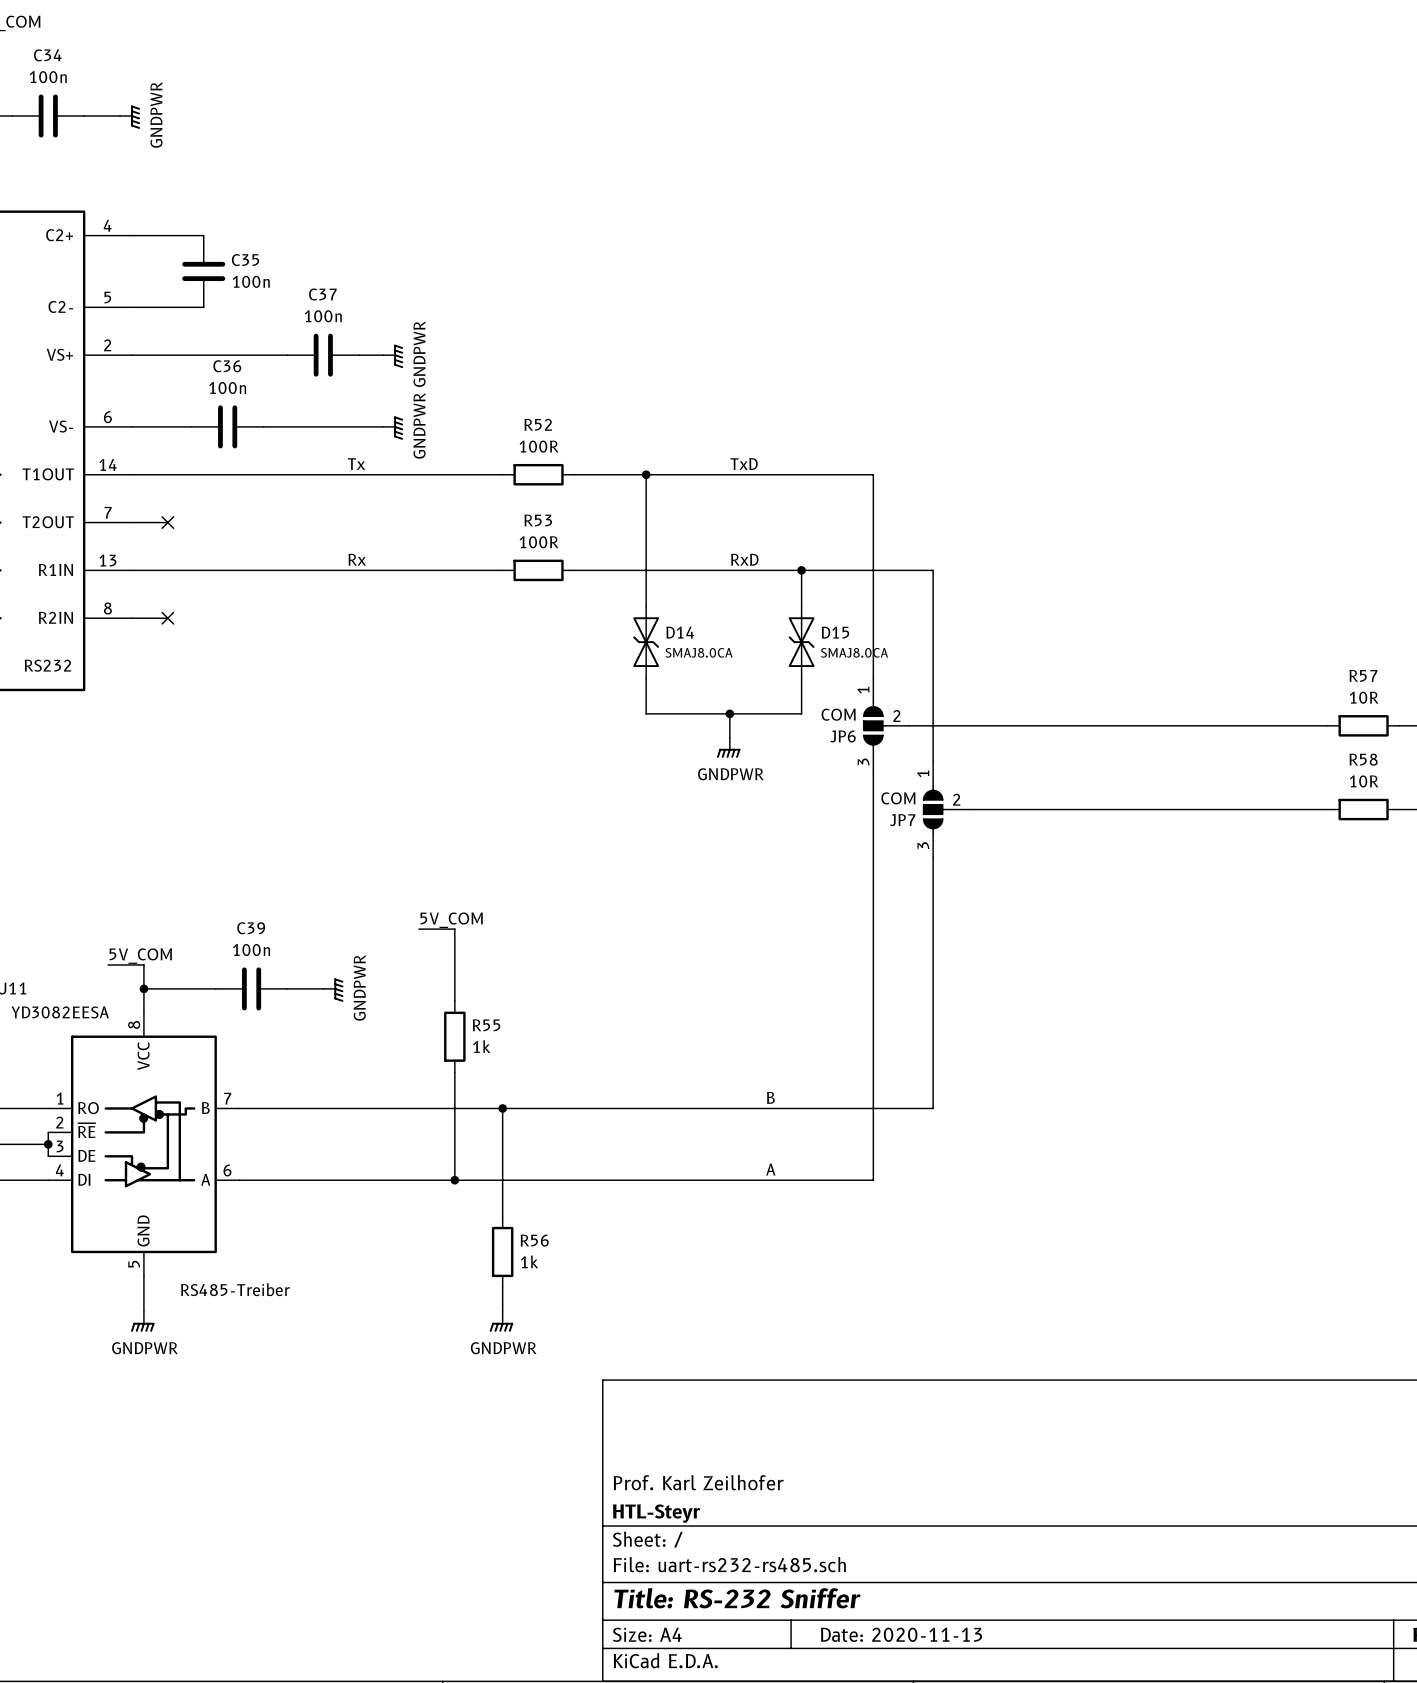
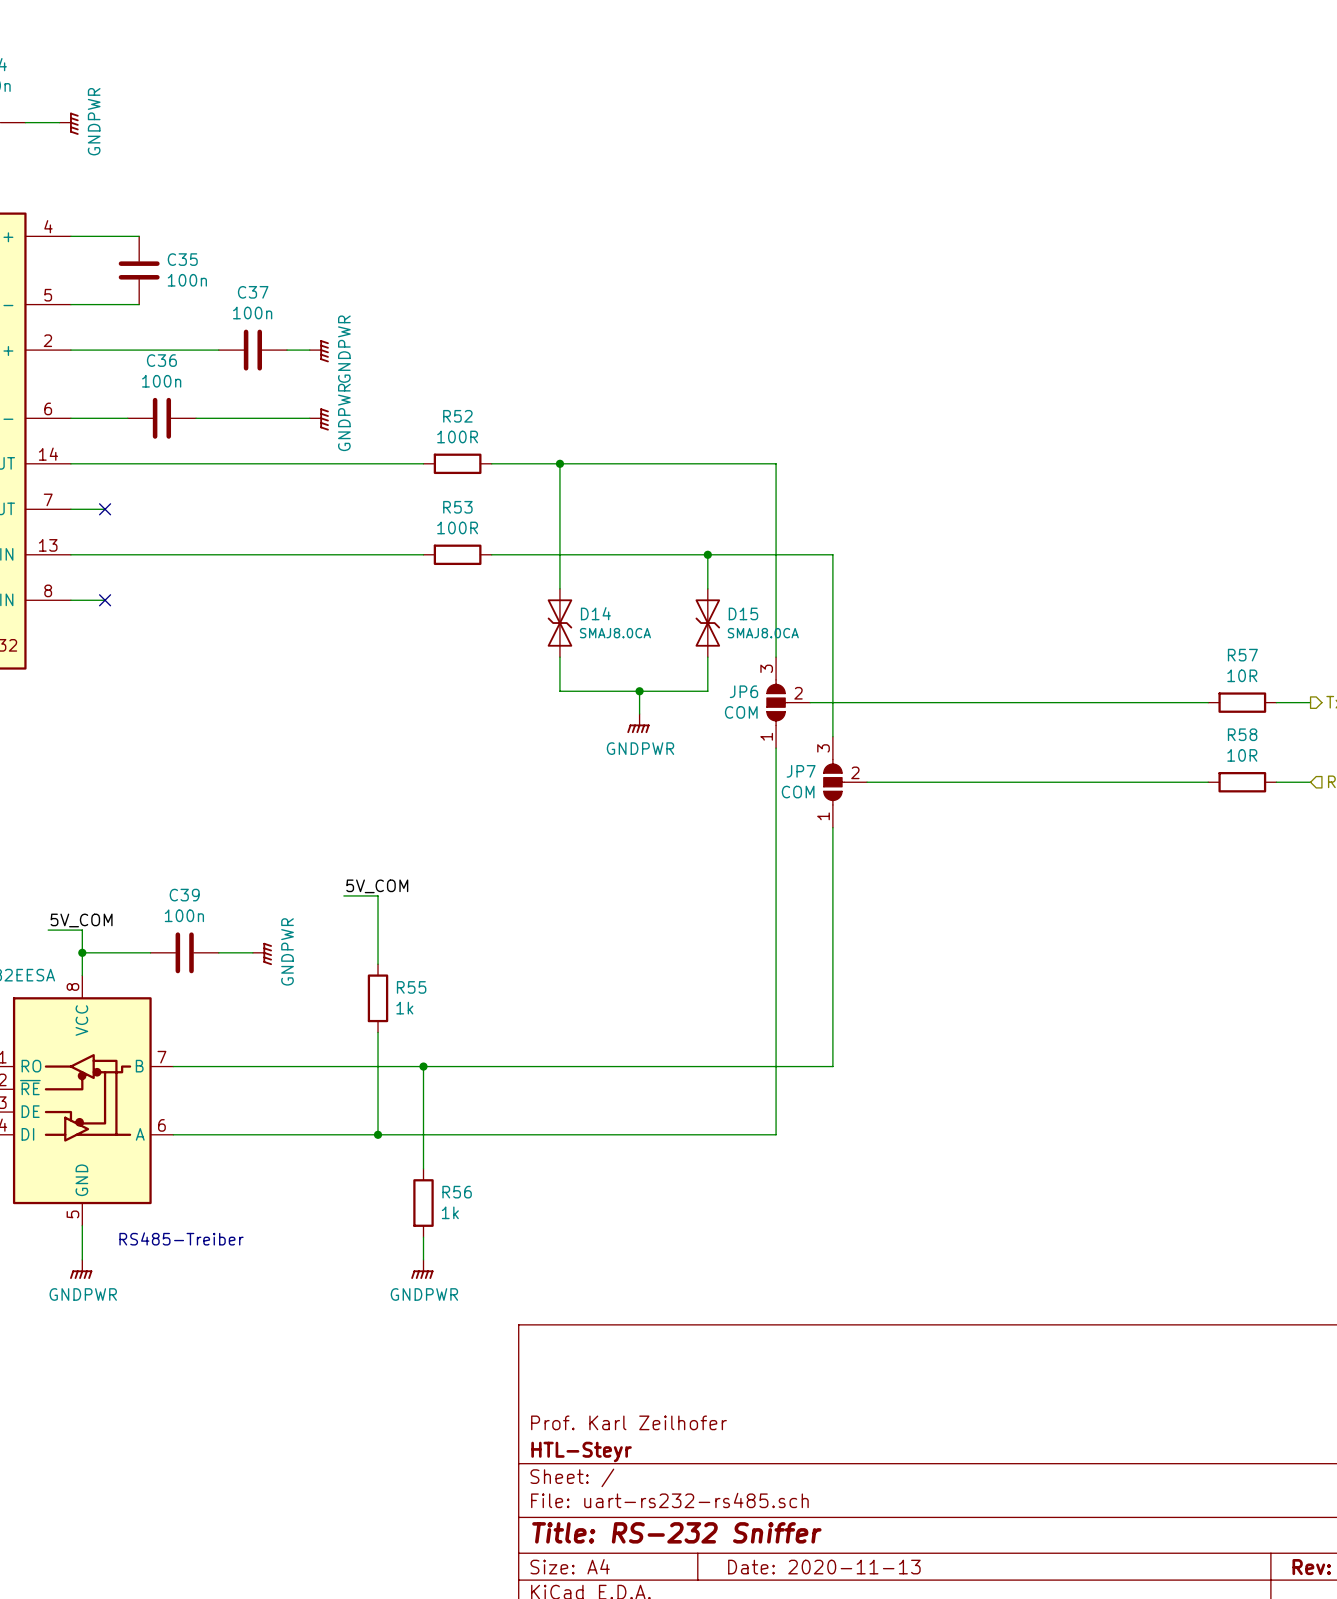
label: Tx (356, 464) -> none
label: TxD (744, 464) -> none
label: Rx (357, 559) -> none
label: RxD (744, 559) -> none
JP6 flip: as is (874, 725) -> up-down (777, 702)
JP7 flip: as is (934, 809) -> up-down (834, 782)
label: B (770, 1097) -> none
label: A (770, 1169) -> none

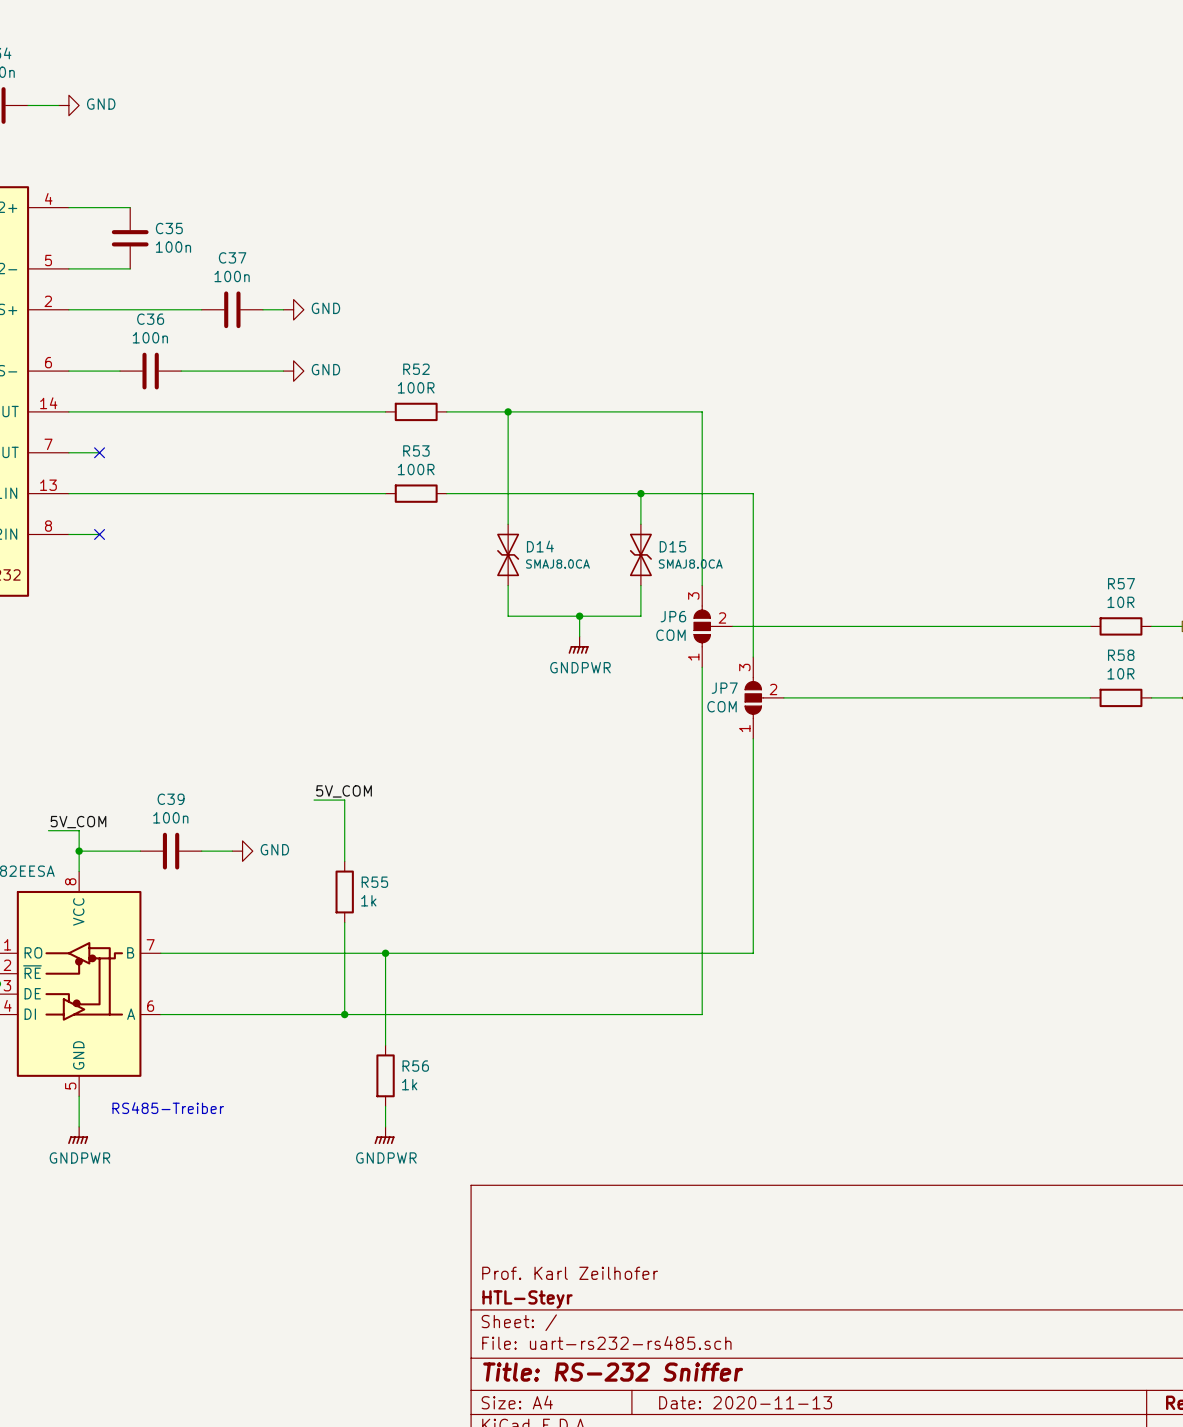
power symbol: GNDPWR (69, 123) -> GND (68, 105)
power symbol: GNDPWR (319, 351) -> GND (293, 309)
power symbol: GNDPWR (319, 419) -> GND (293, 371)
power symbol: GNDPWR (262, 953) -> GND (242, 851)

